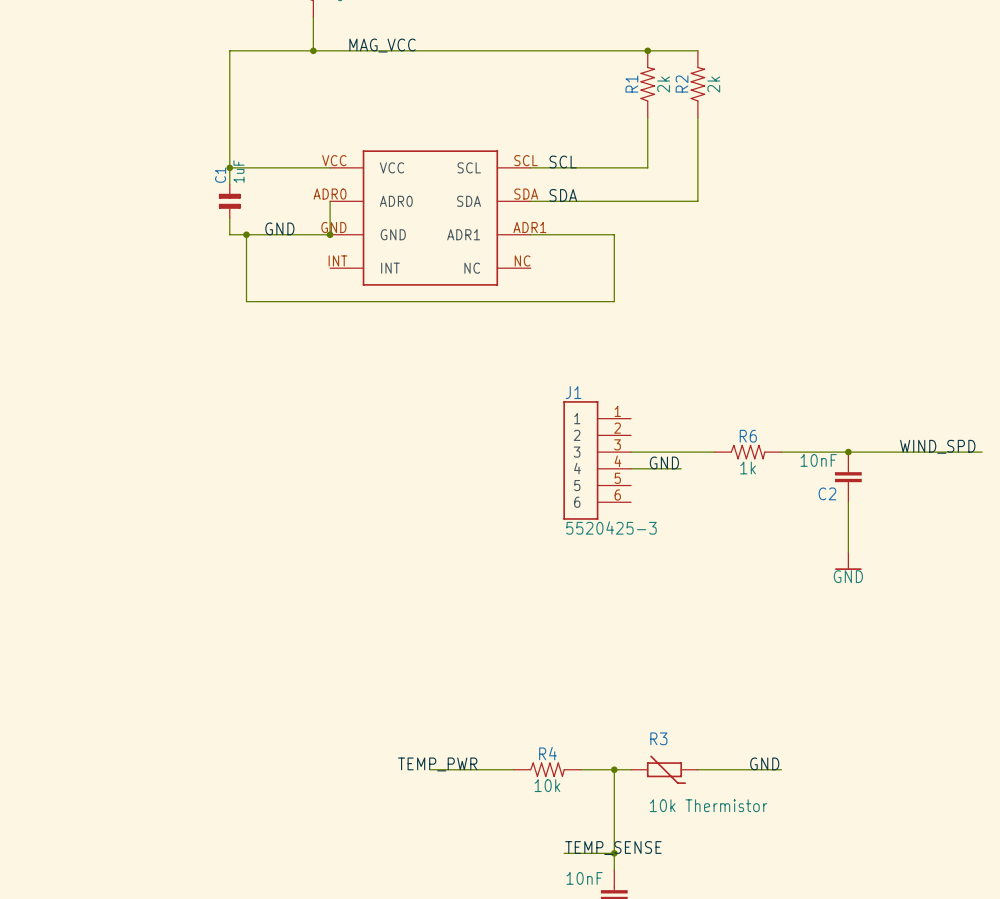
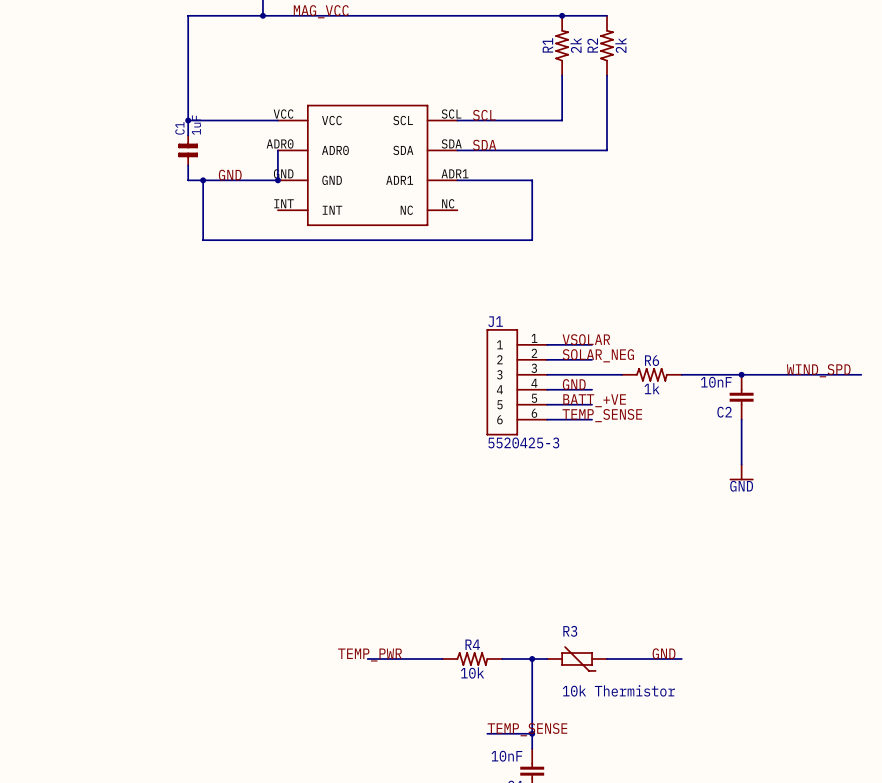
label: none -> VSOLAR (586, 339)
wire: none -> (547, 344) (592, 344)
label: none -> SOLAR_NEG (598, 355)
wire: none -> (547, 359) (592, 359)
label: none -> BATT_+VE (594, 400)
wire: none -> (547, 404) (592, 404)
label: none -> TEMP_SENSE (602, 415)
wire: none -> (547, 419) (592, 419)

